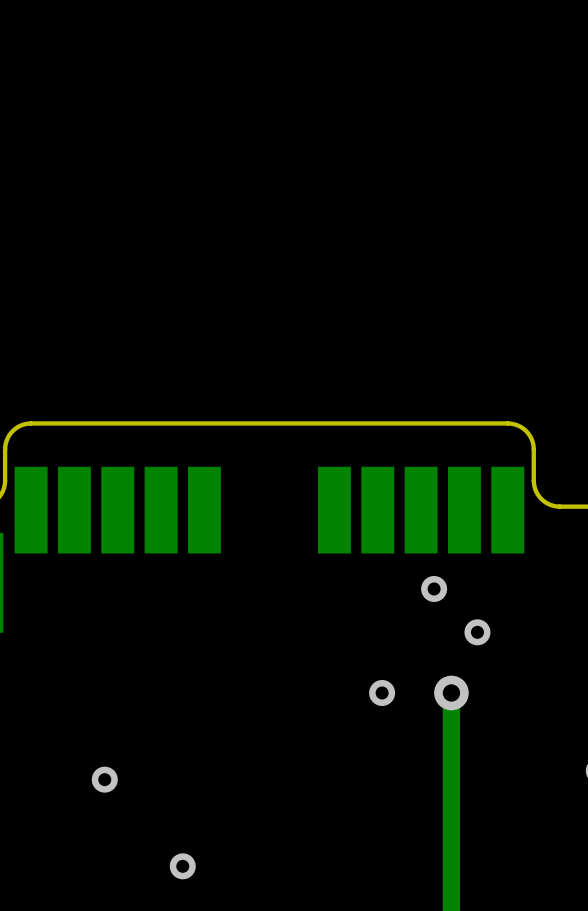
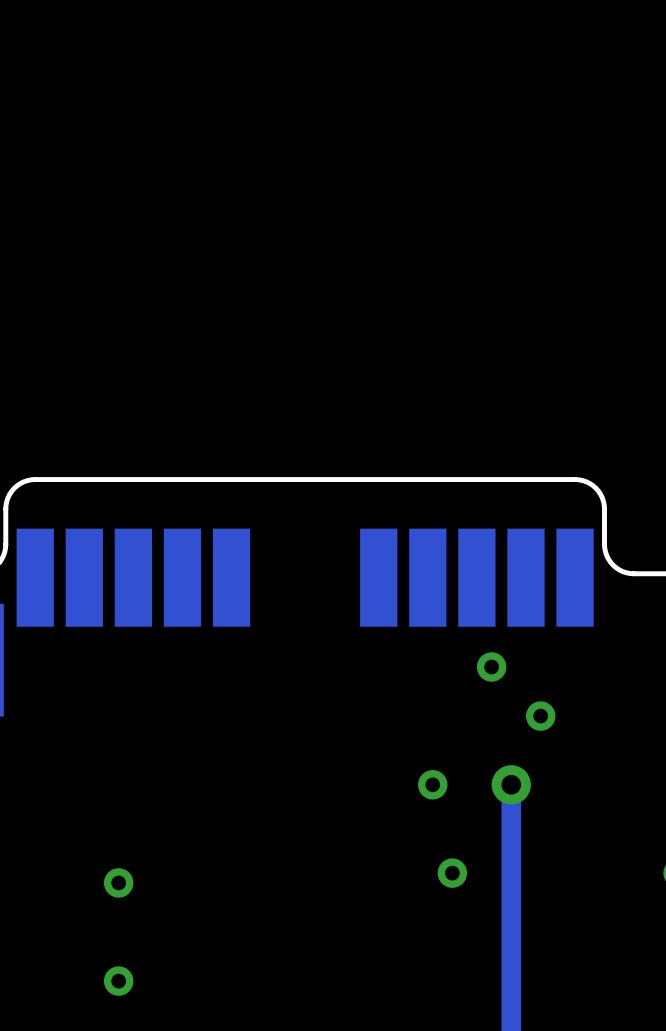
via: none -> (452, 873)
via: none -> (118, 981)
via: (182, 866) -> none

